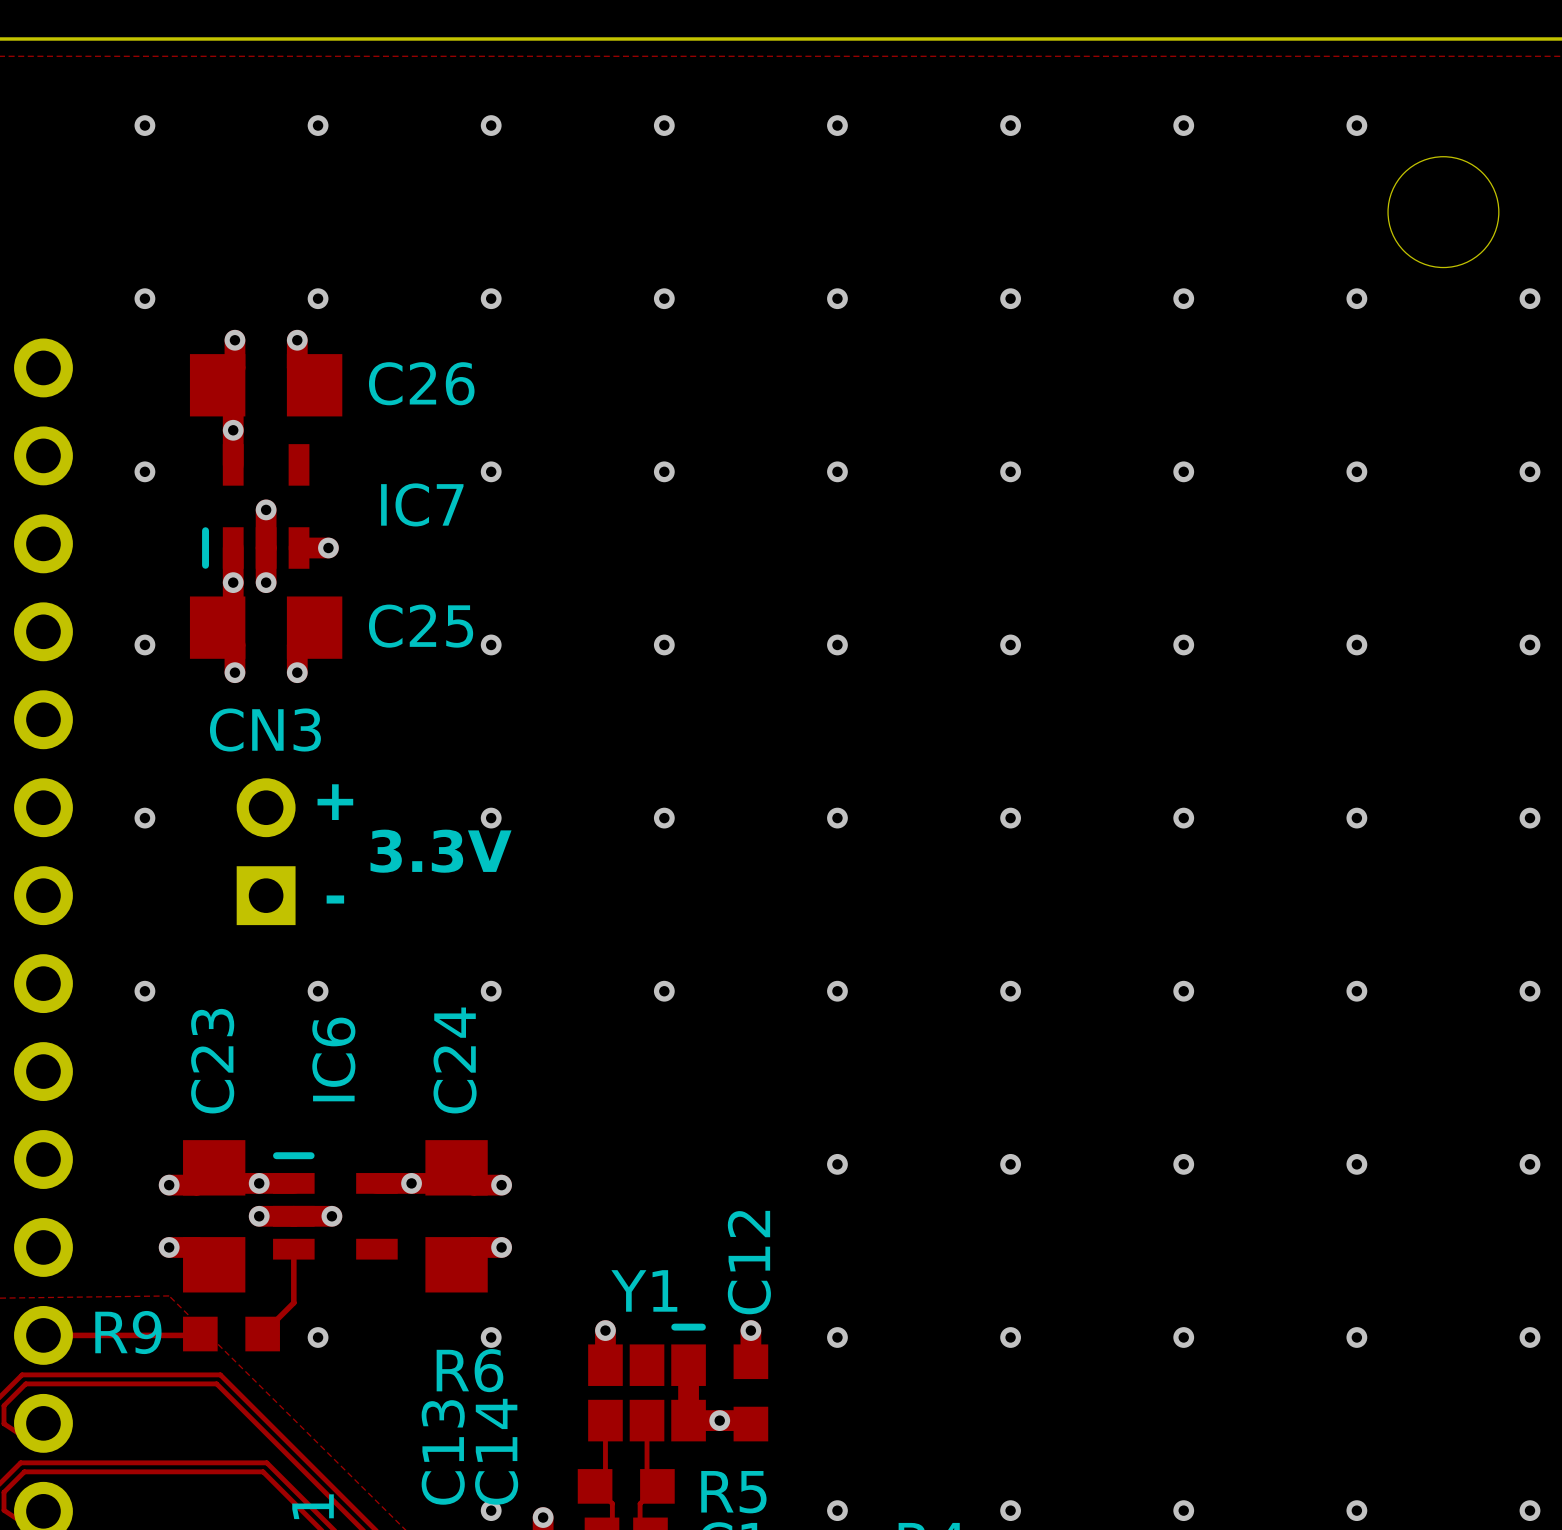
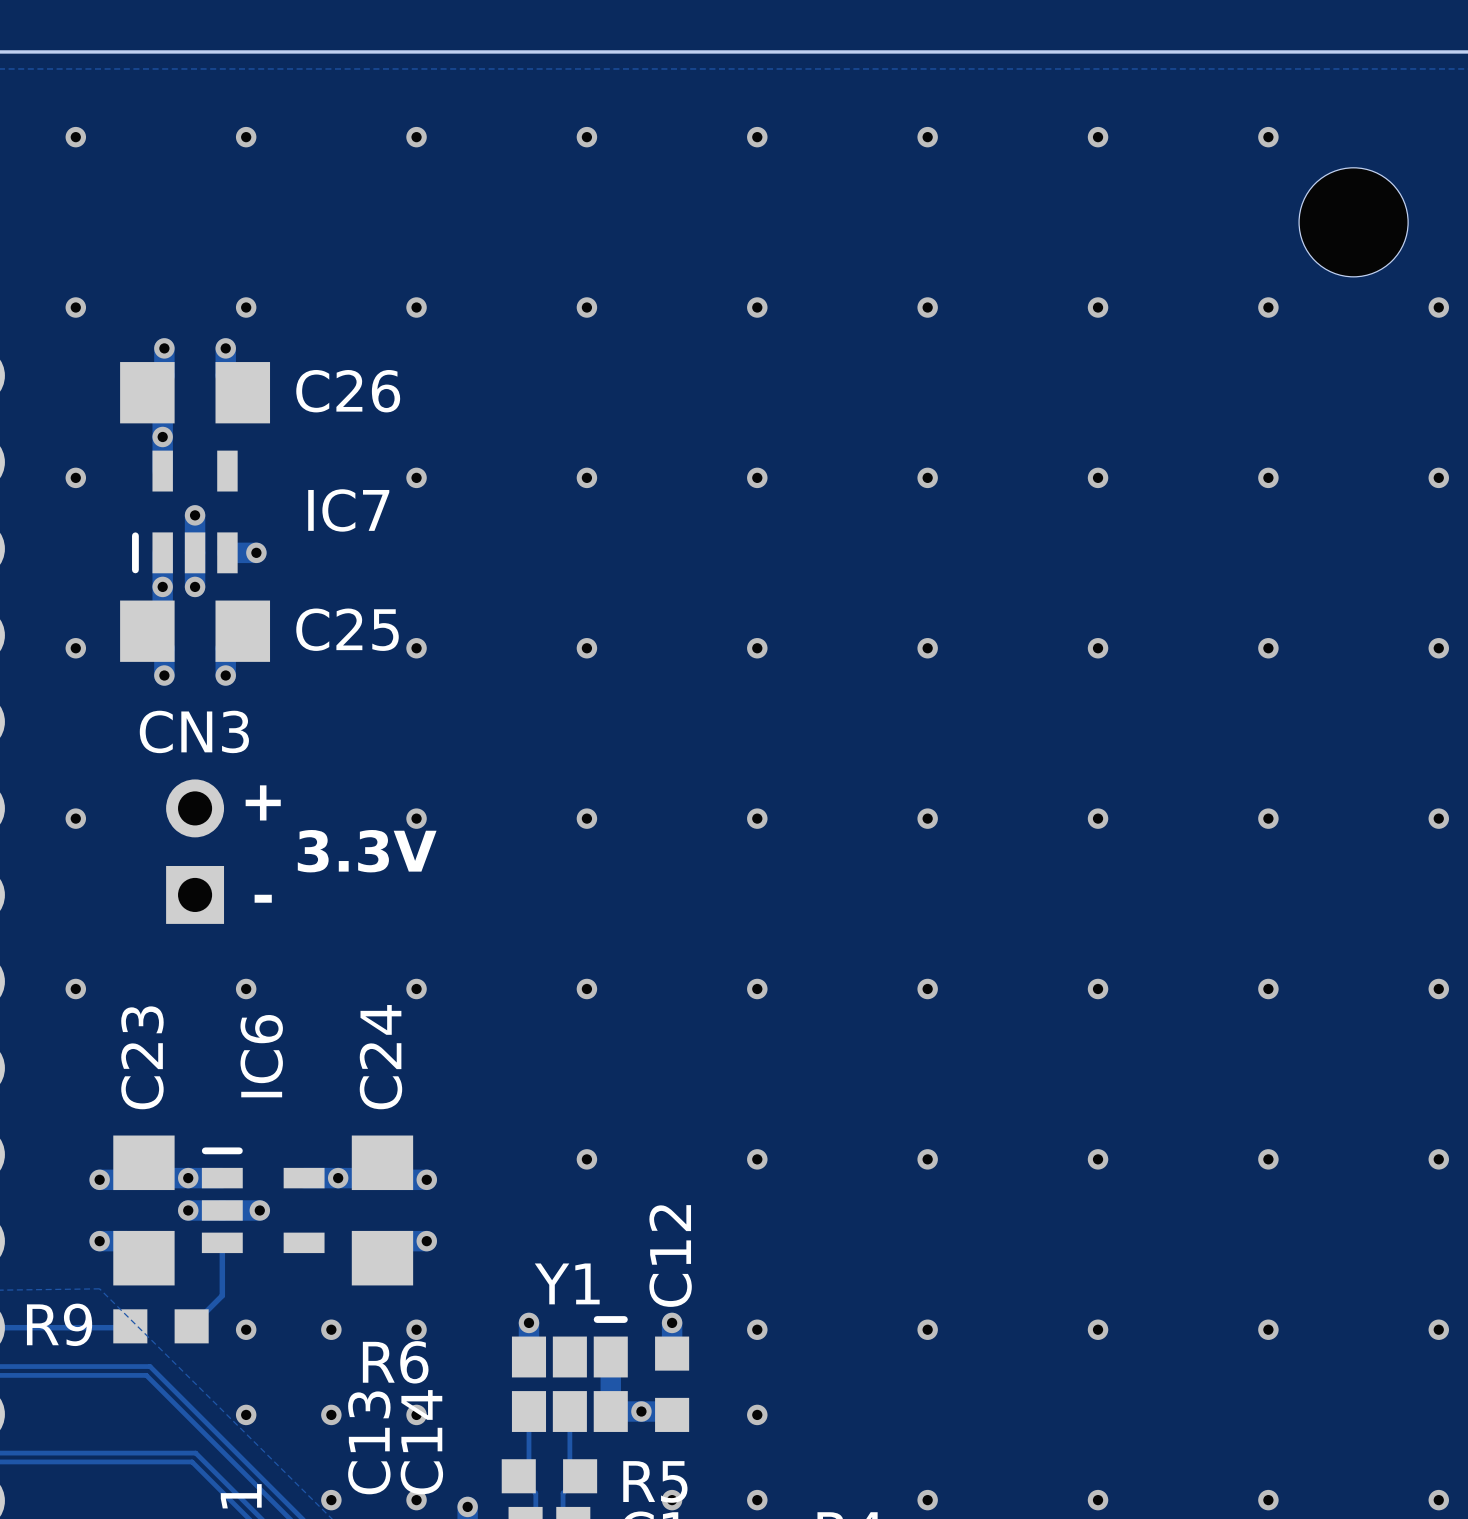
via: none -> (586, 1159)
via: none -> (331, 1329)
via: none -> (246, 1414)
via: none -> (331, 1414)
via: none -> (416, 1414)
via: none -> (757, 1414)
via: none -> (331, 1500)
via: none -> (672, 1500)

